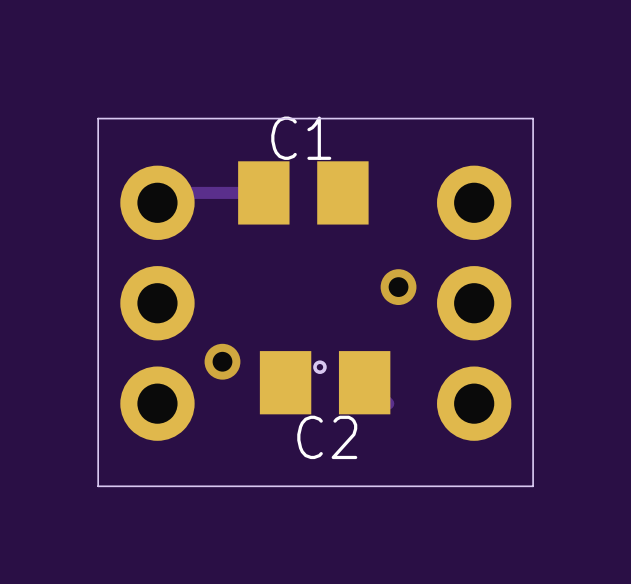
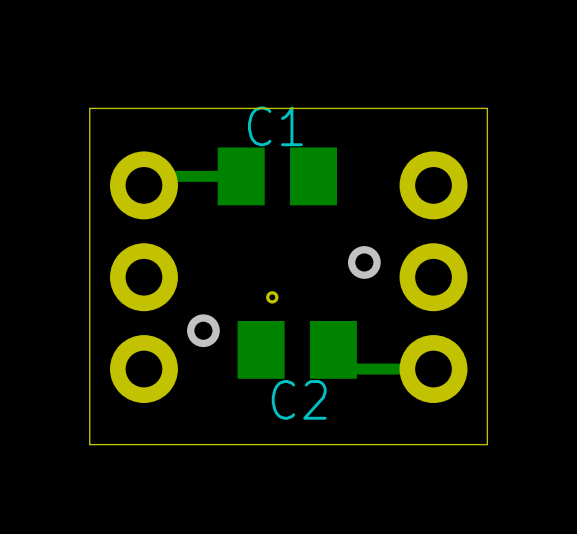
part position: (319, 367) -> (272, 297)
track: none -> (433, 369) (354, 369)

